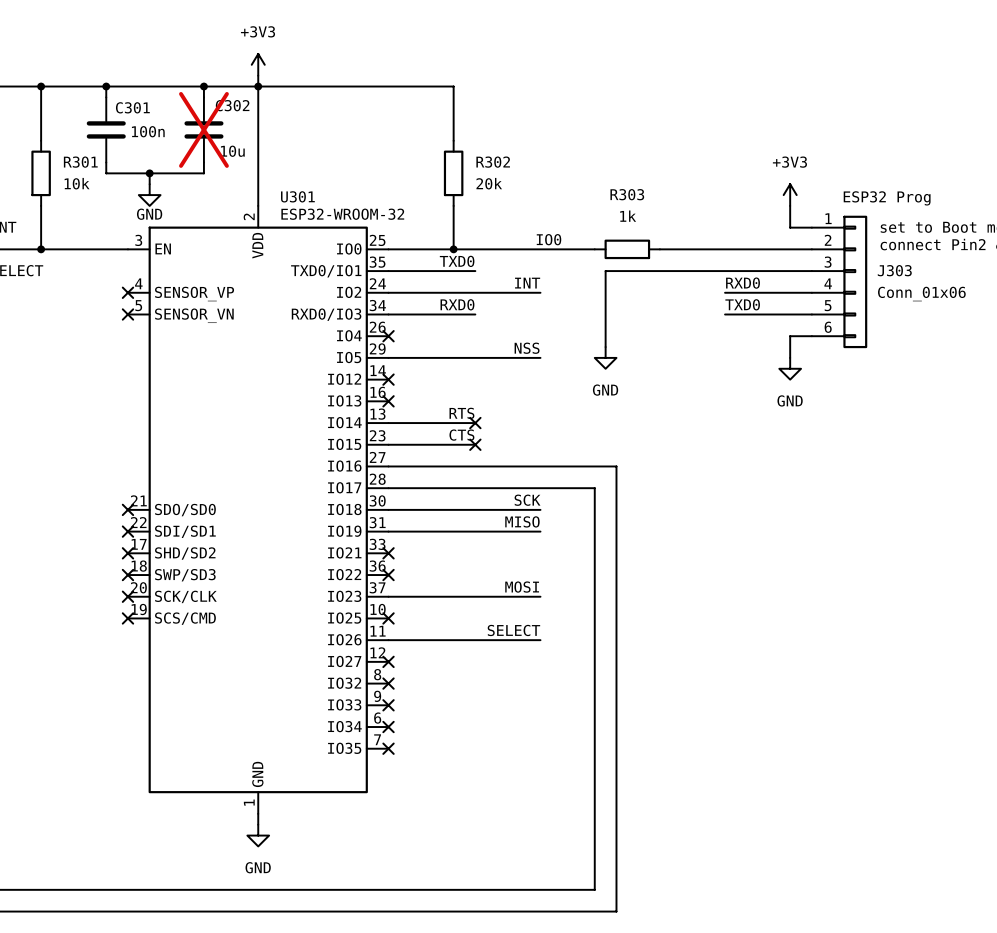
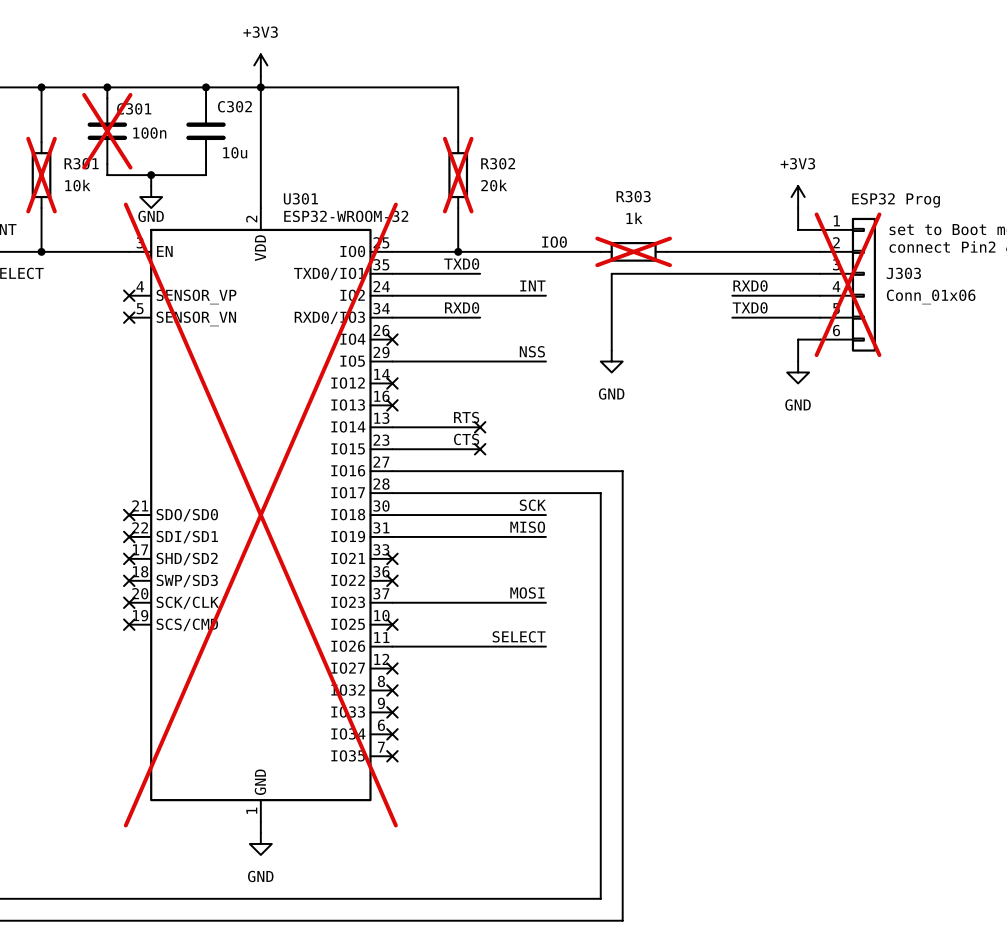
C301 do-not-place cross: none -> (107, 131)
C302 do-not-place cross: (203, 129) -> none
R301 do-not-place cross: none -> (41, 175)
R302 do-not-place cross: none -> (458, 175)
R303 do-not-place cross: none -> (633, 251)
J303 do-not-place cross: none -> (848, 284)
U301 do-not-place cross: none -> (260, 515)

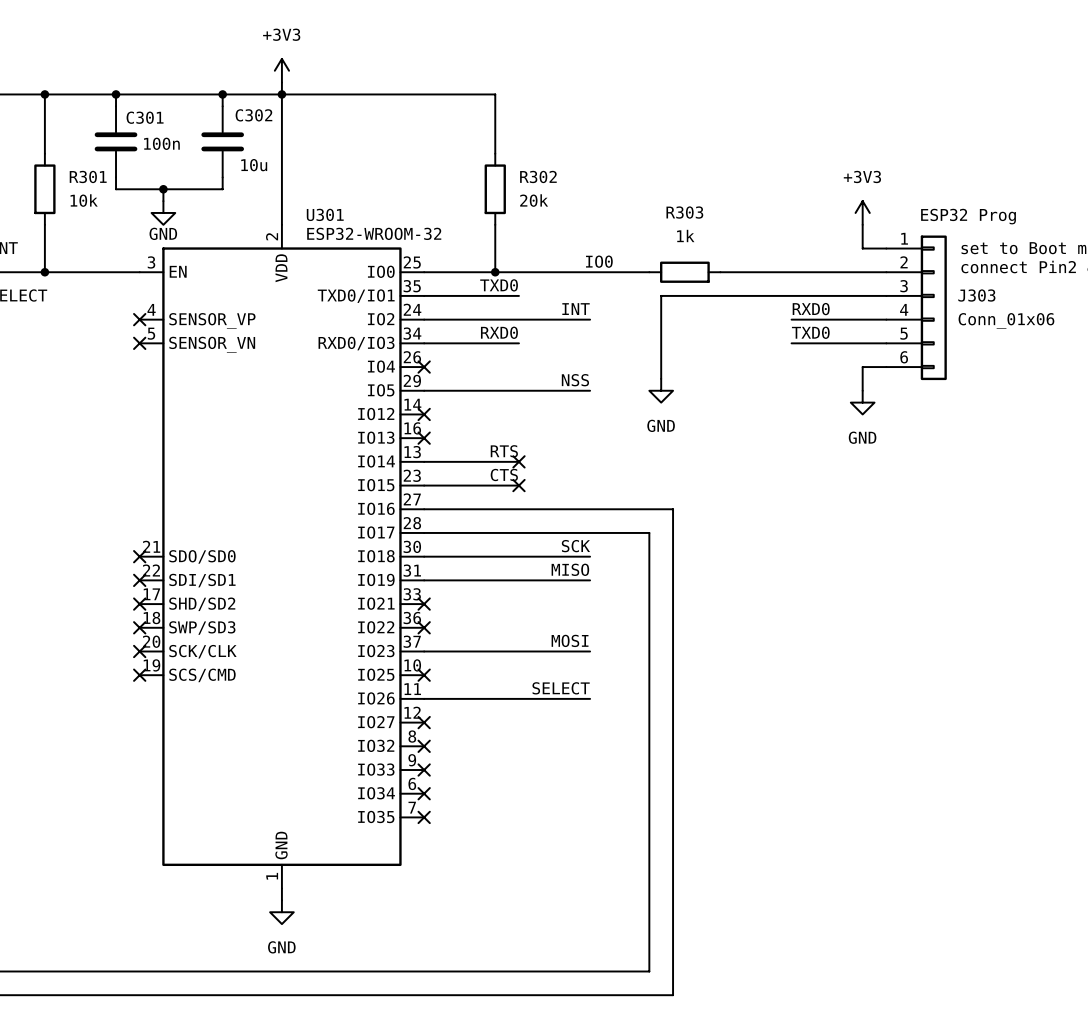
C301 do-not-place cross: (107, 131) -> none
R301 do-not-place cross: (41, 175) -> none
R302 do-not-place cross: (458, 175) -> none
R303 do-not-place cross: (633, 251) -> none
J303 do-not-place cross: (848, 284) -> none
U301 do-not-place cross: (260, 515) -> none

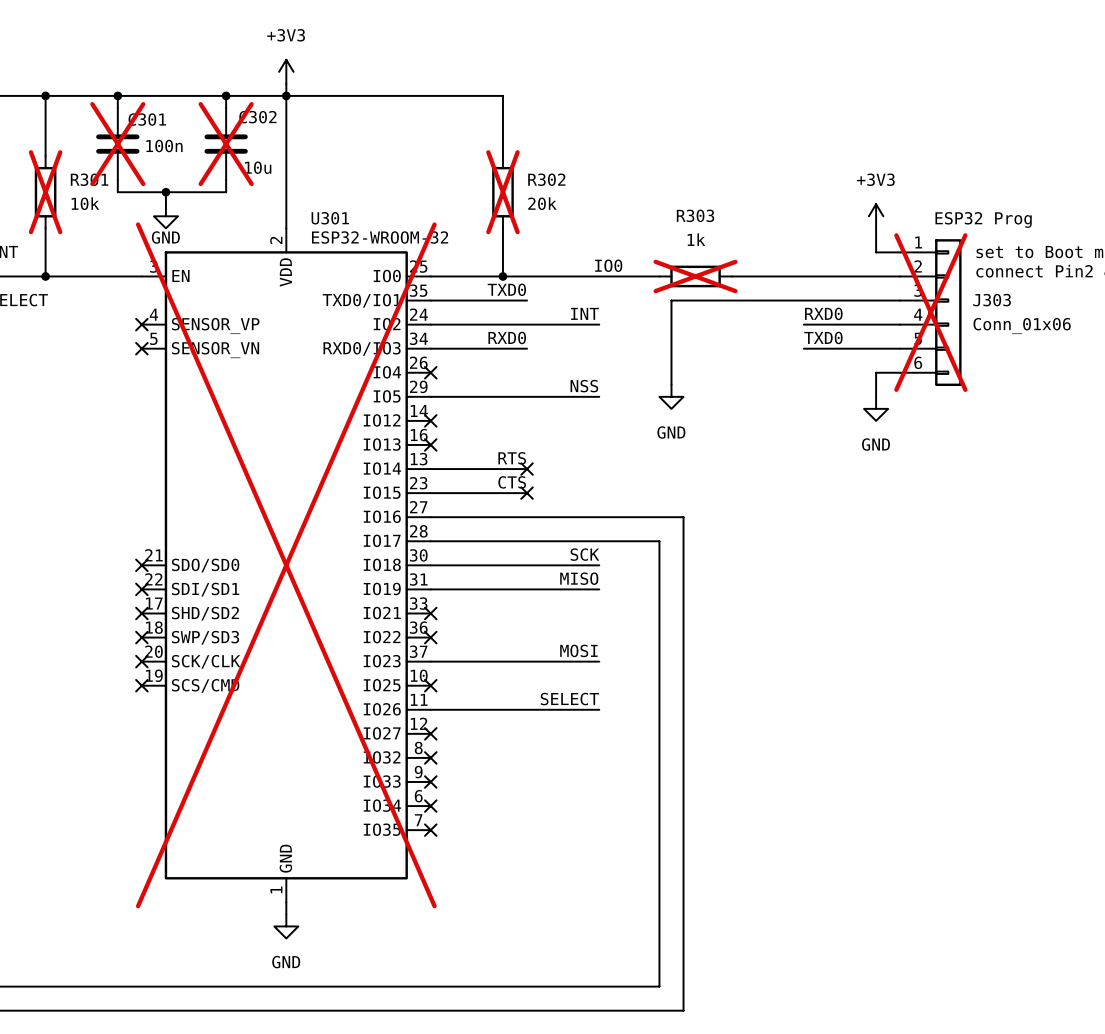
C301 do-not-place cross: none -> (117, 144)
C302 do-not-place cross: none -> (226, 144)
R301 do-not-place cross: none -> (45, 192)
R302 do-not-place cross: none -> (502, 192)
R303 do-not-place cross: none -> (695, 276)
J303 do-not-place cross: none -> (930, 312)
U301 do-not-place cross: none -> (286, 565)

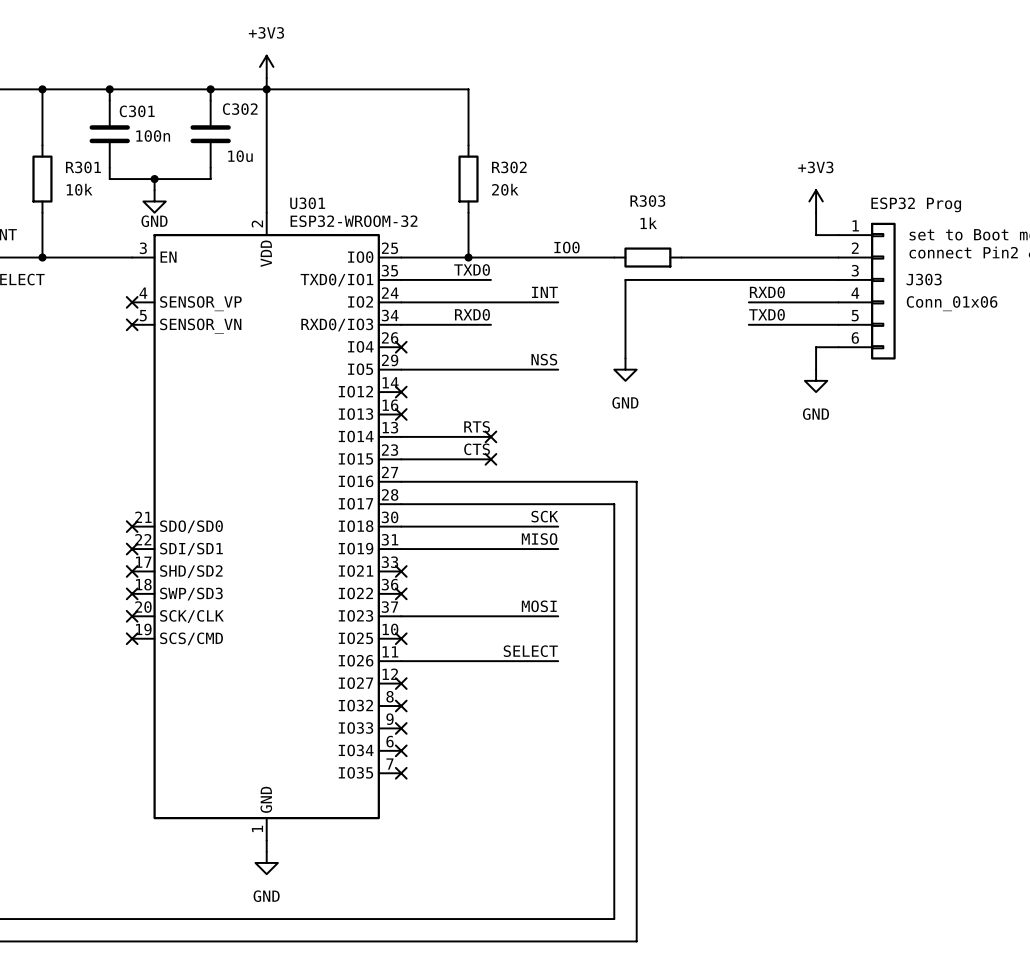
C301 do-not-place cross: (117, 144) -> none
C302 do-not-place cross: (226, 144) -> none
R301 do-not-place cross: (45, 192) -> none
R302 do-not-place cross: (502, 192) -> none
R303 do-not-place cross: (695, 276) -> none
J303 do-not-place cross: (930, 312) -> none
U301 do-not-place cross: (286, 565) -> none

